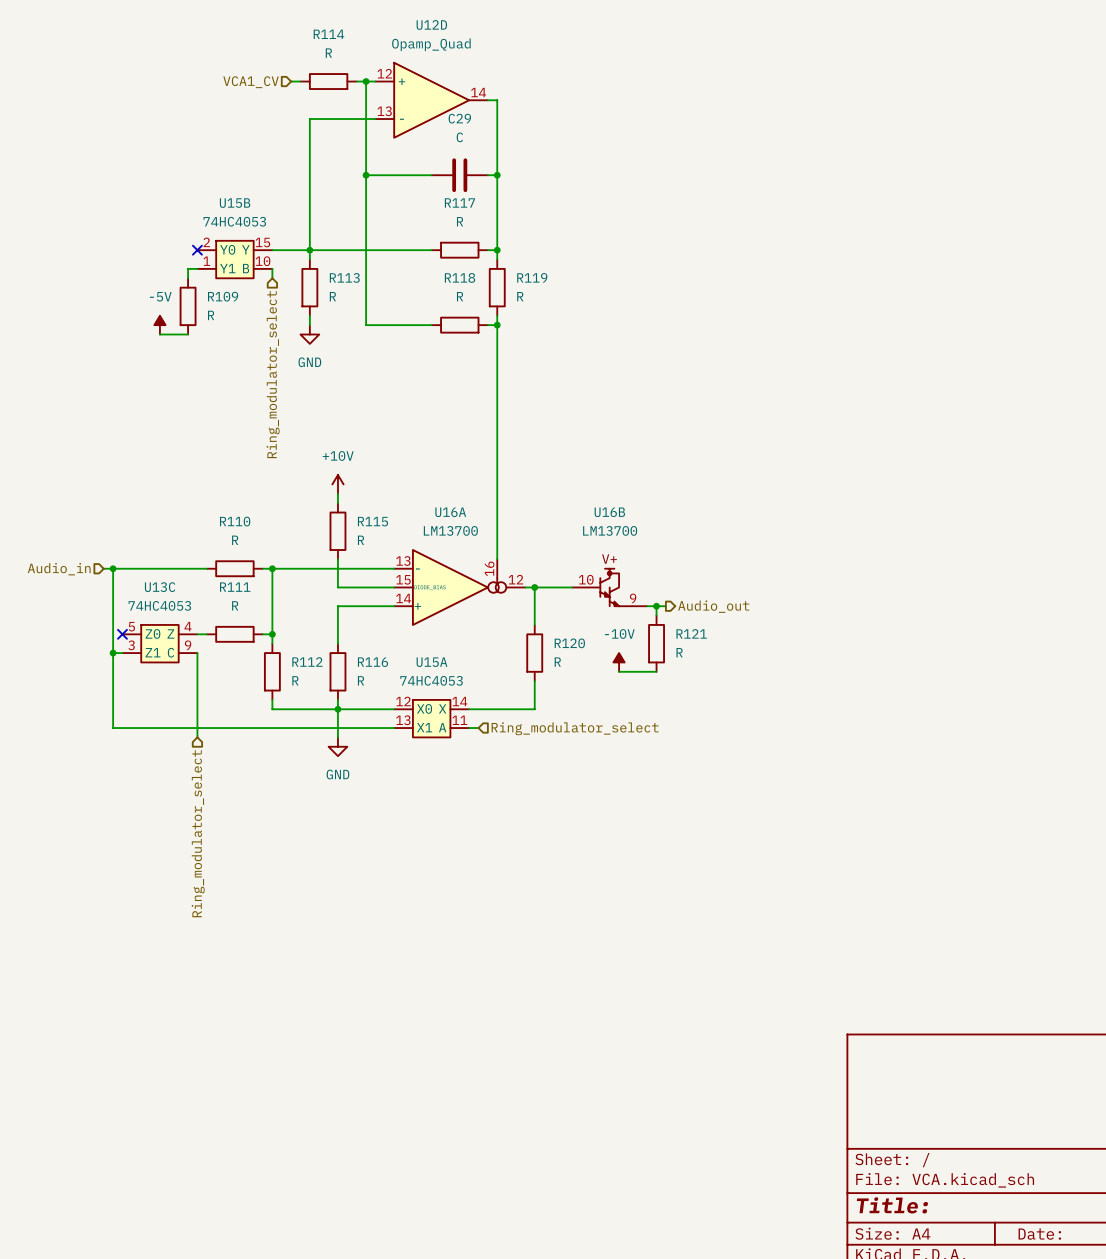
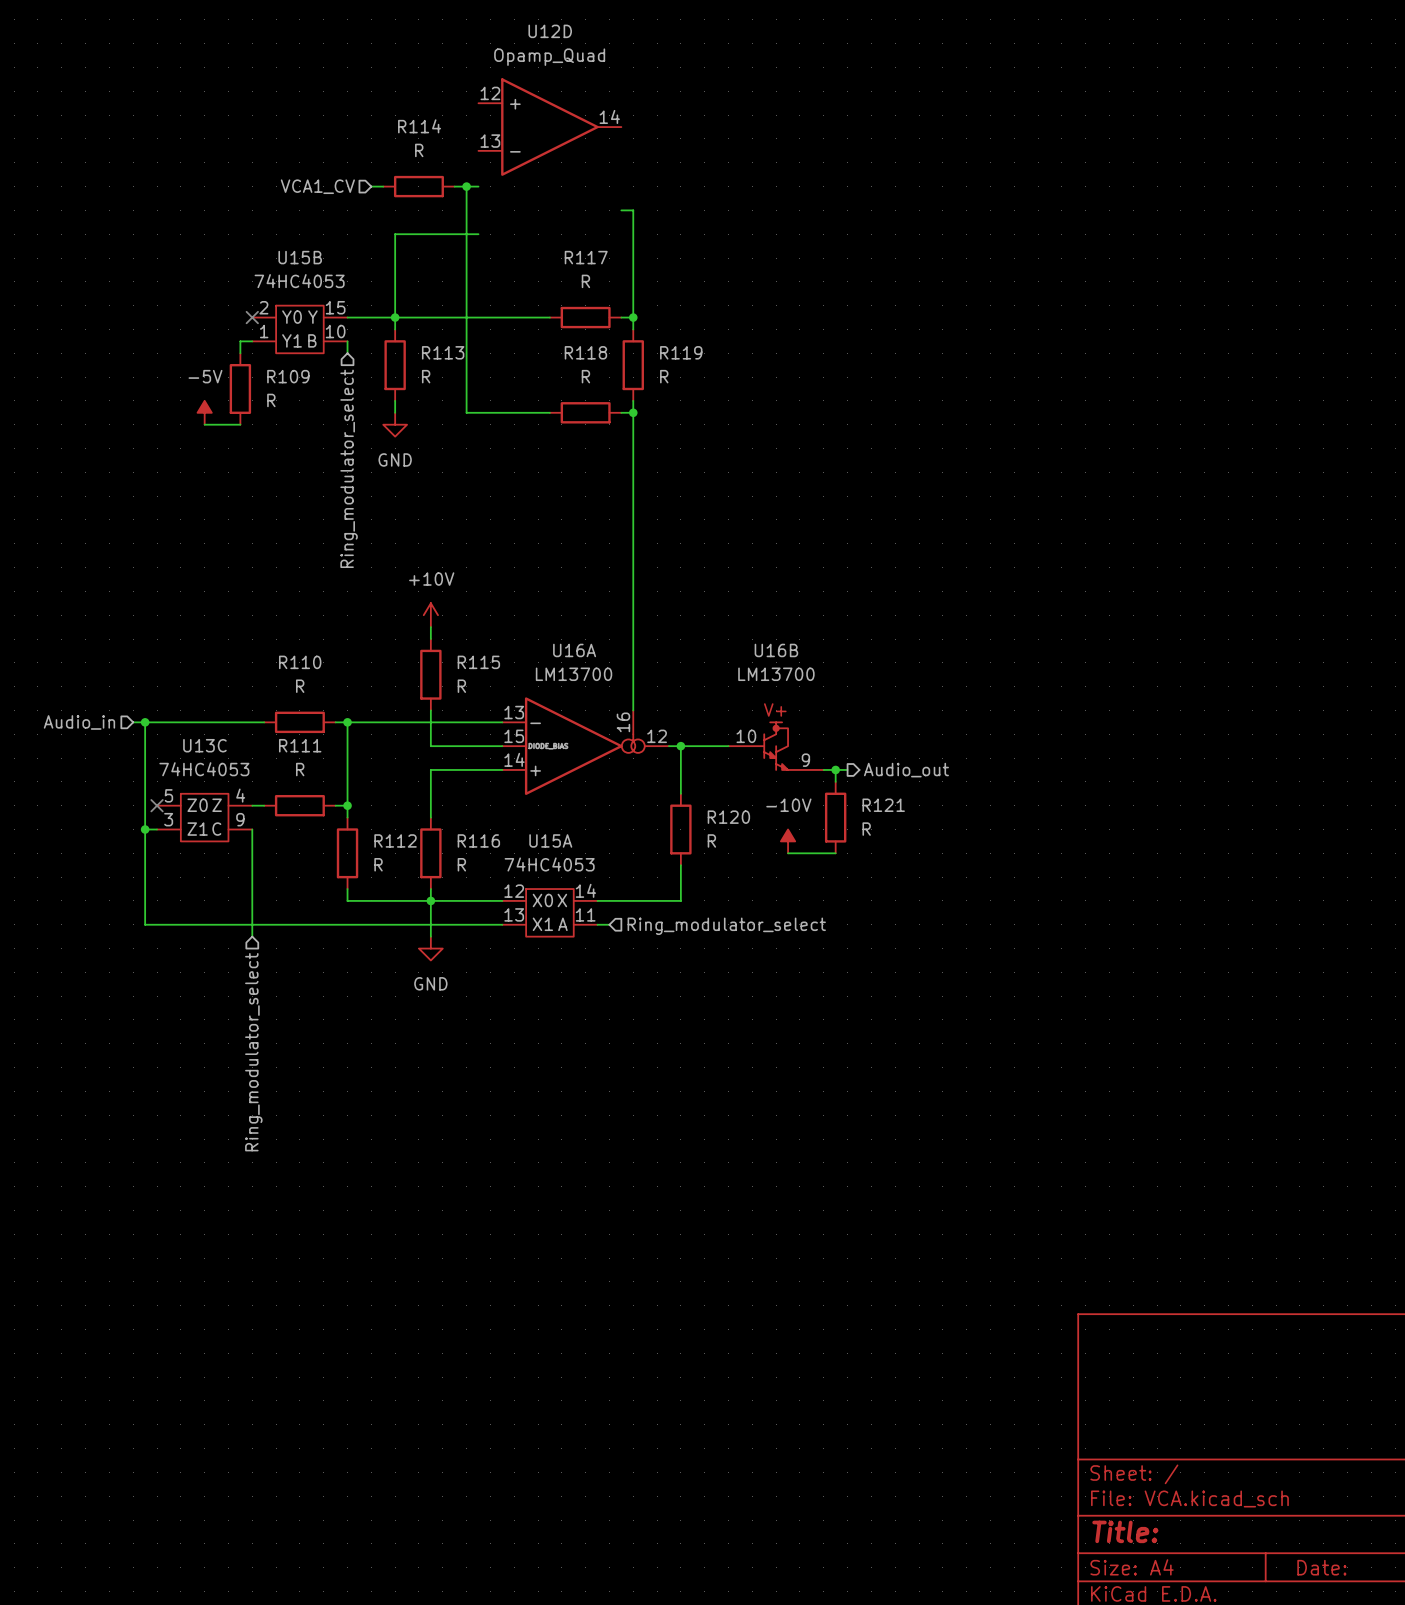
wire: (291, 81) (300, 81) -> (371, 186) (383, 186)
R114 position: (328, 81) -> (418, 186)
wire: (356, 81) (375, 81) -> (454, 186) (478, 186)
wire: (366, 81) (366, 147) -> none
junction: (366, 81) -> none
hierarchical label position: VCA1_CV (251, 82) -> VCA1_CV (317, 186)
wire: (487, 100) (497, 100) (497, 165) -> (621, 210) (633, 210)
wire: (375, 119) (309, 119) (309, 184) -> (478, 234) (395, 234)
wire: (366, 175) (431, 175) -> none
junction position: (366, 175) -> (466, 186)
C29: C (459, 175) -> none
wire: (487, 175) (497, 175) -> none
junction: (497, 175) -> none

